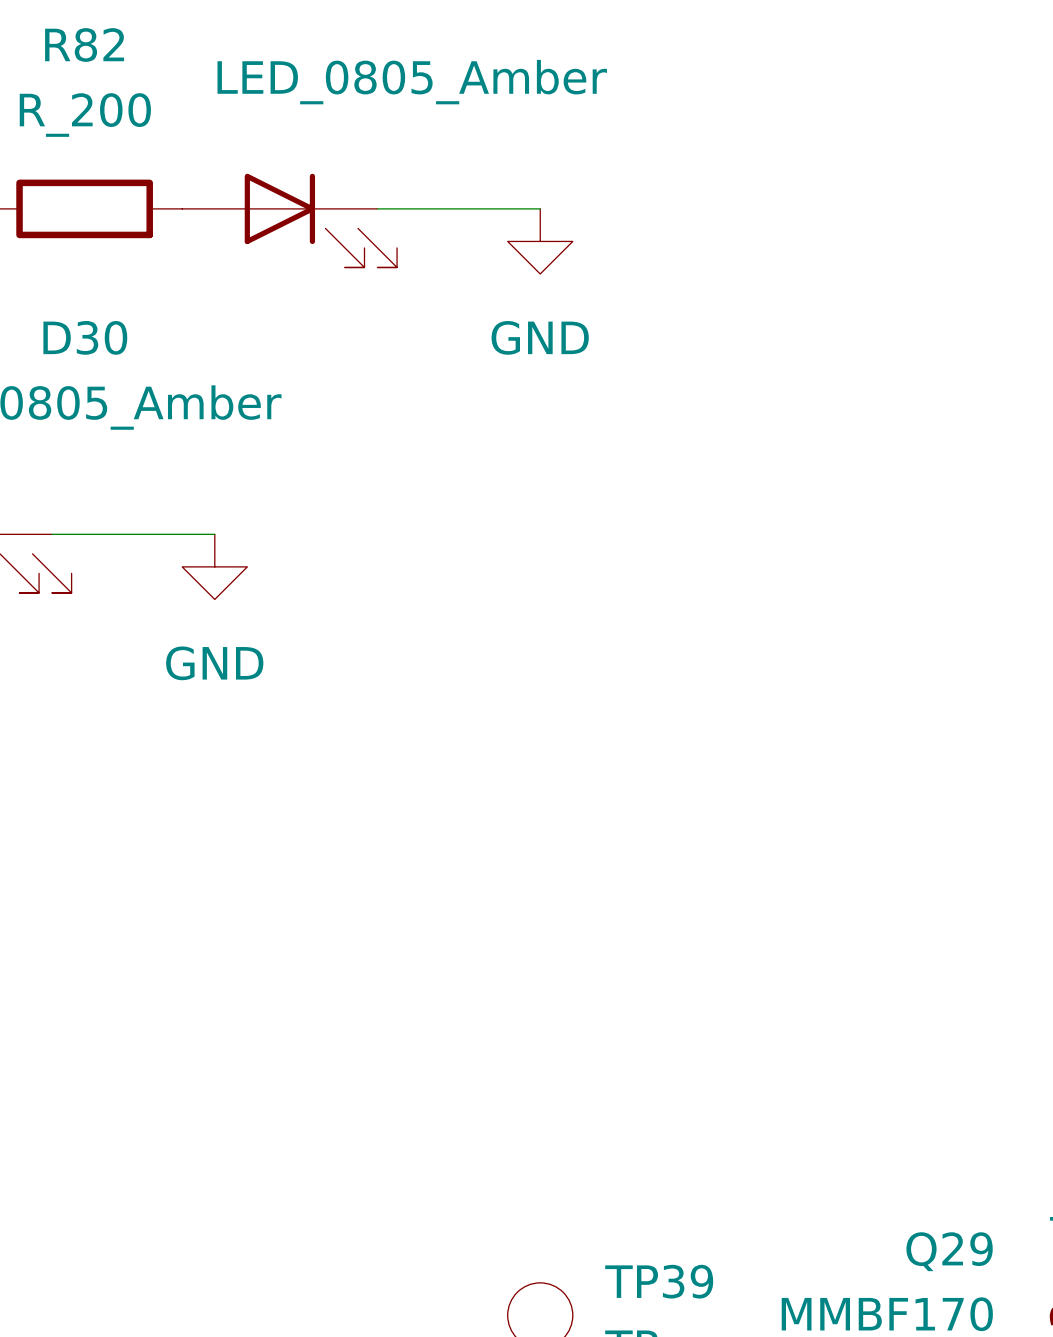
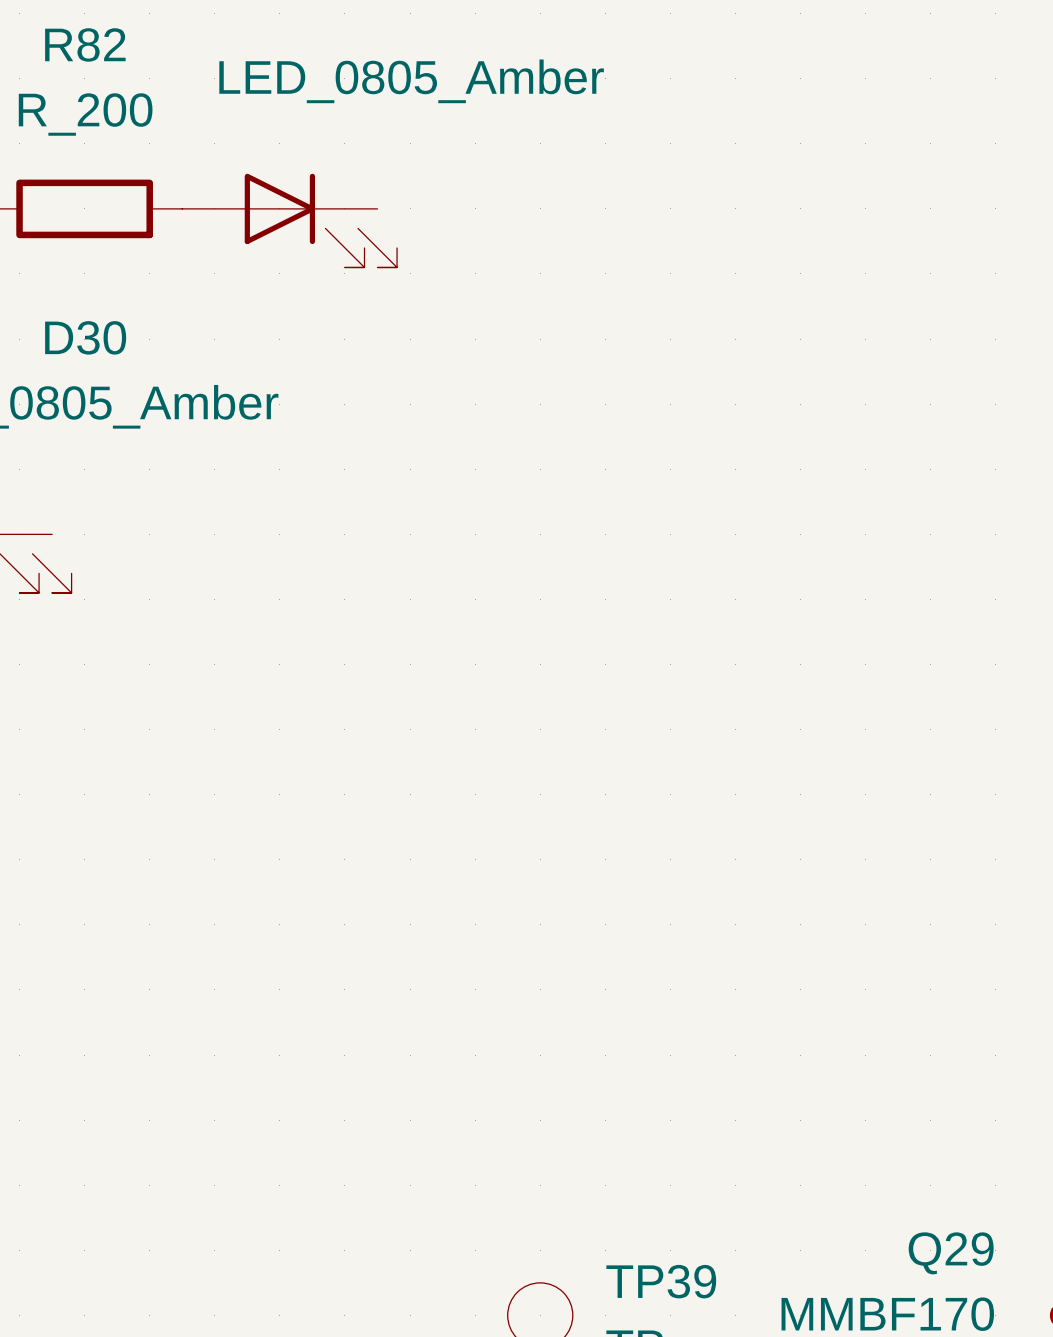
wire: (377, 208) (540, 208) -> none
power symbol: GND (540, 241) -> none
wire: (52, 534) (214, 534) -> none
power symbol: GND (214, 566) -> none

